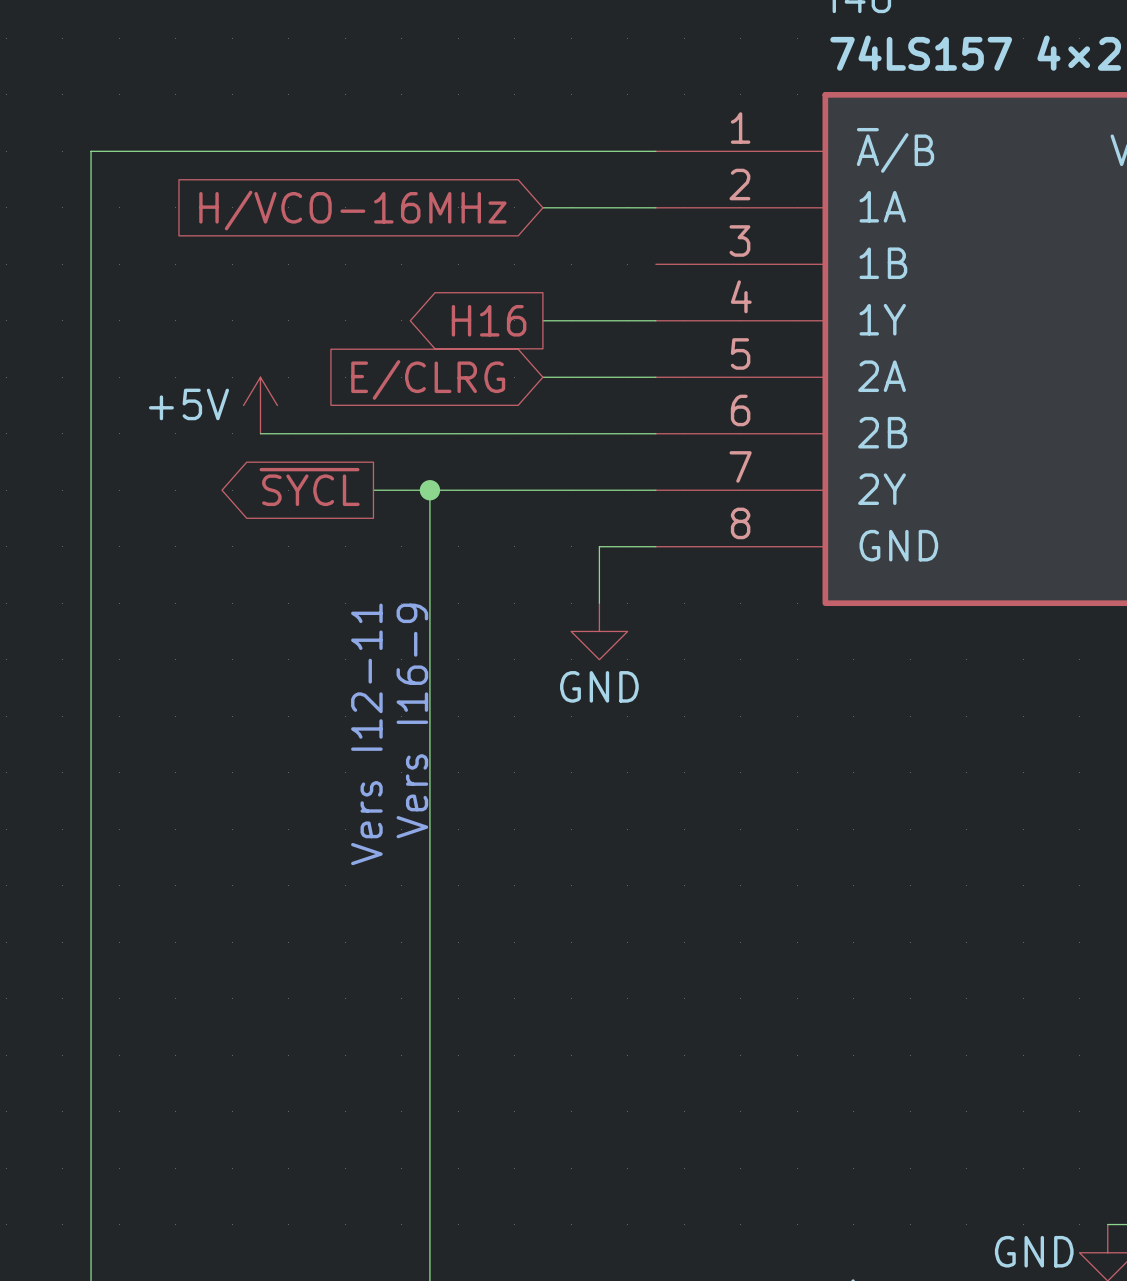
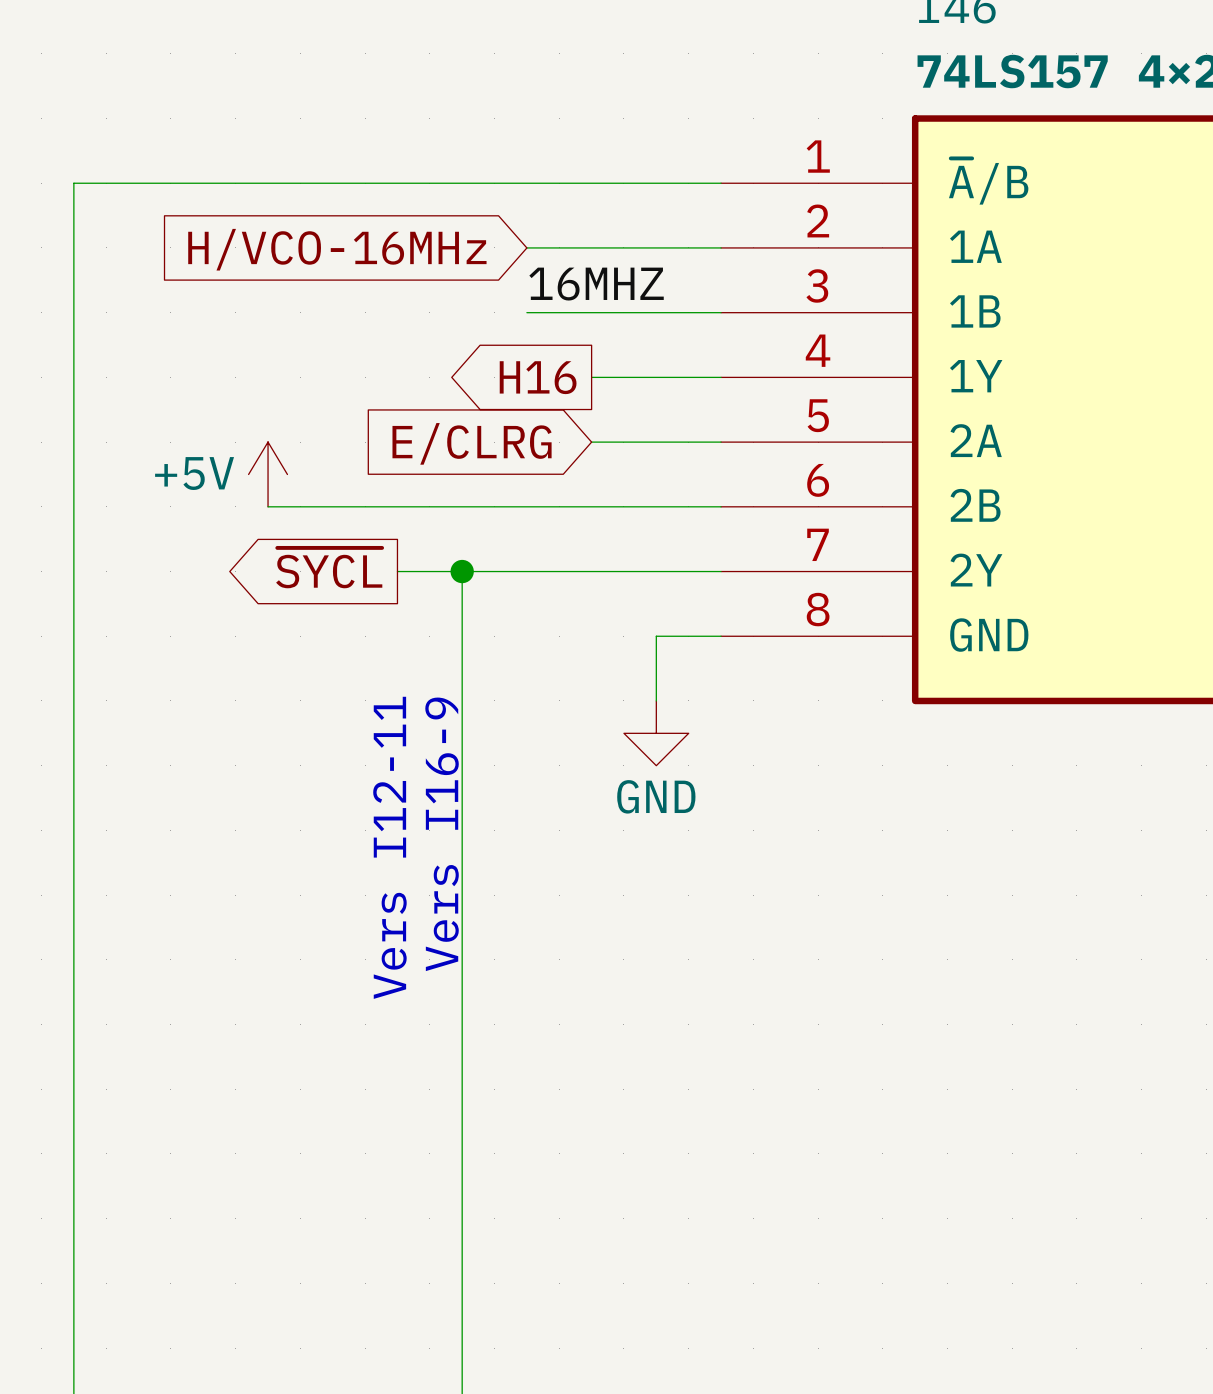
wire: none -> (526, 247) (591, 247)
global label position: H/VCO-16MHz (352, 210) -> H/VCO-16MHz (337, 249)
label: none -> 16MHZ (596, 284)
wire: none -> (526, 312) (721, 312)

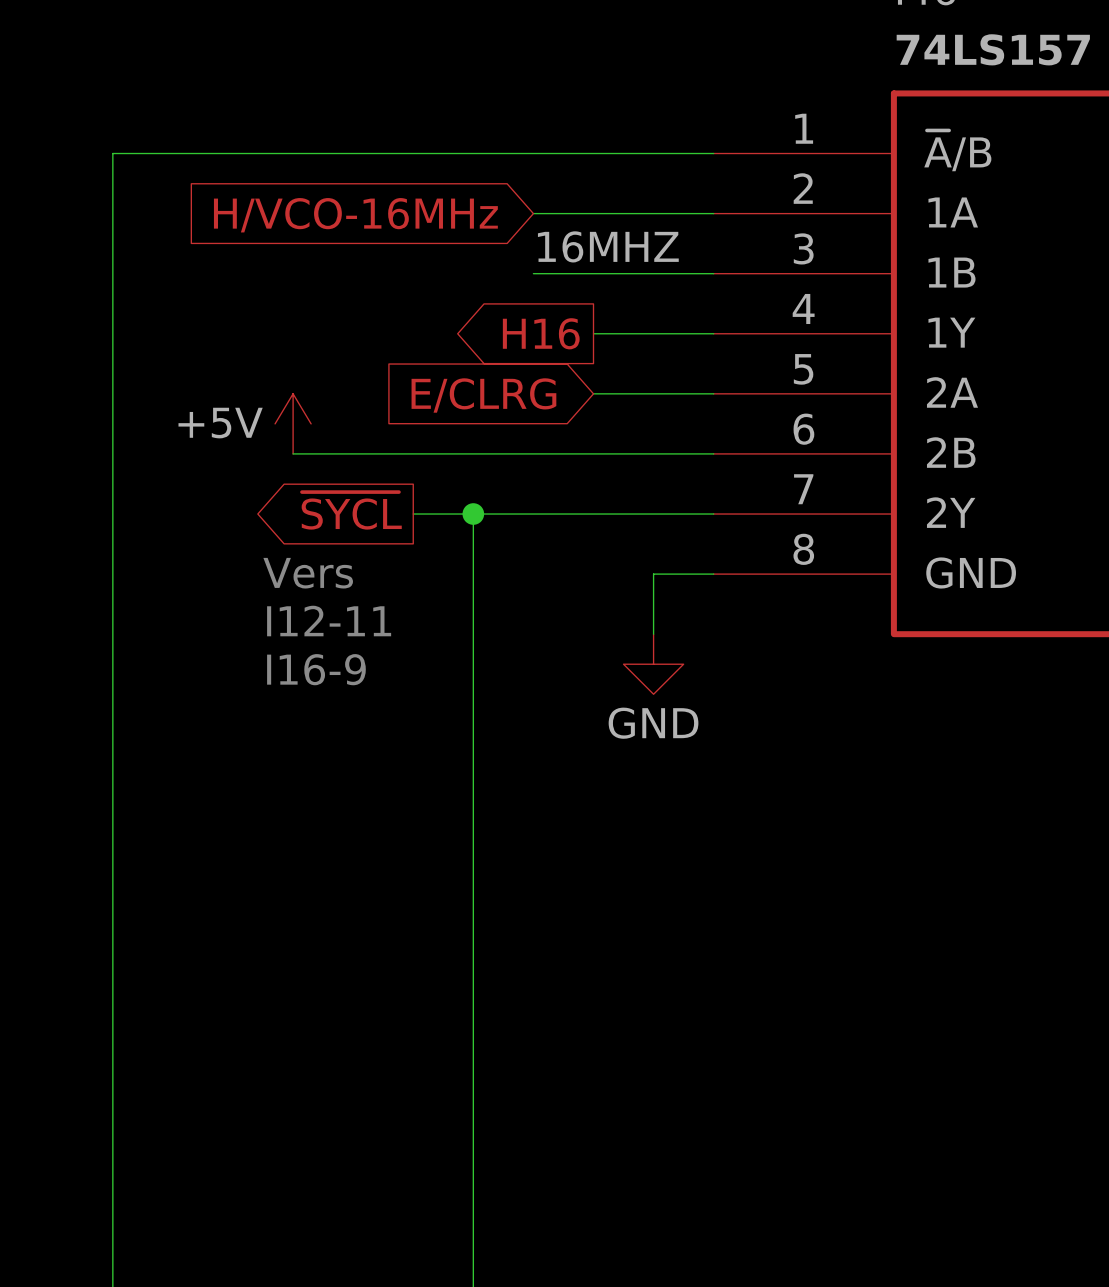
text: none -> Vers (308, 573)
text: Vers I16-9 (442, 834) -> I16-9 (316, 669)
text: Vers I12-11 (389, 847) -> I12-11 (329, 621)

